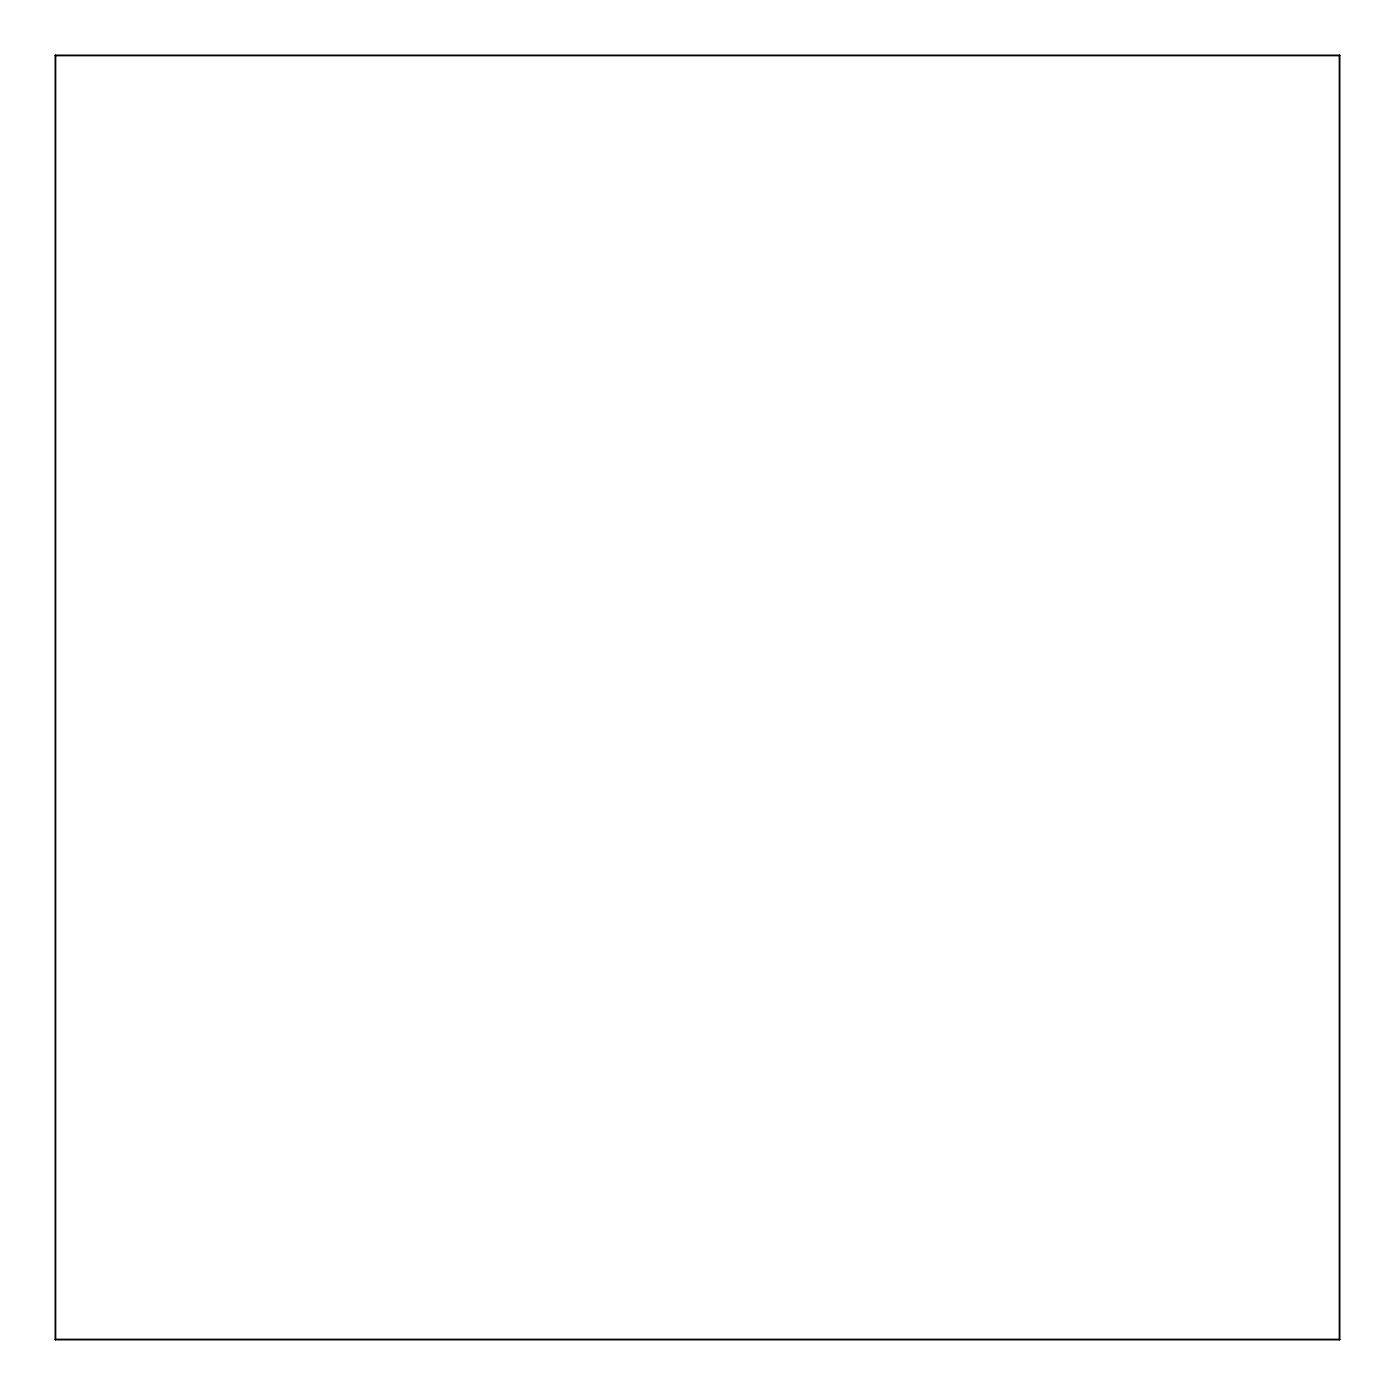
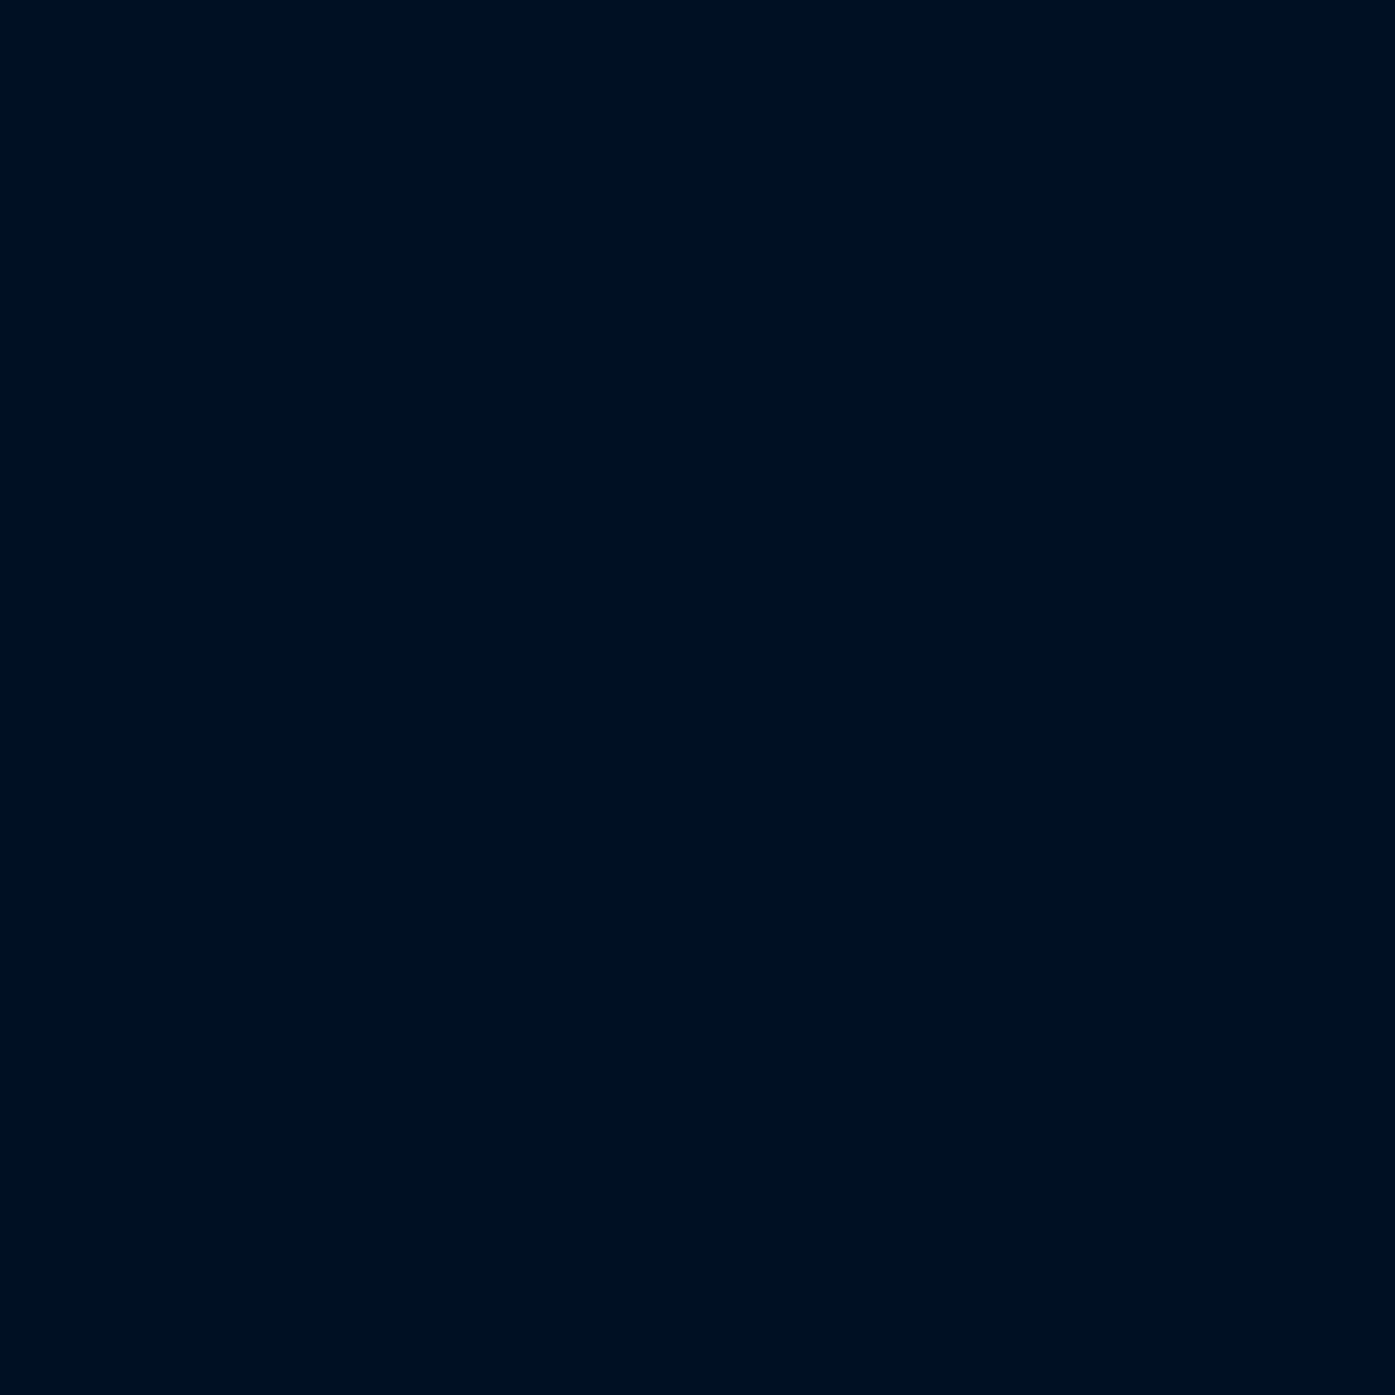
board edge: (1339, 55) (55, 55) (55, 1339) (1339, 1339) (1339, 55) -> none

